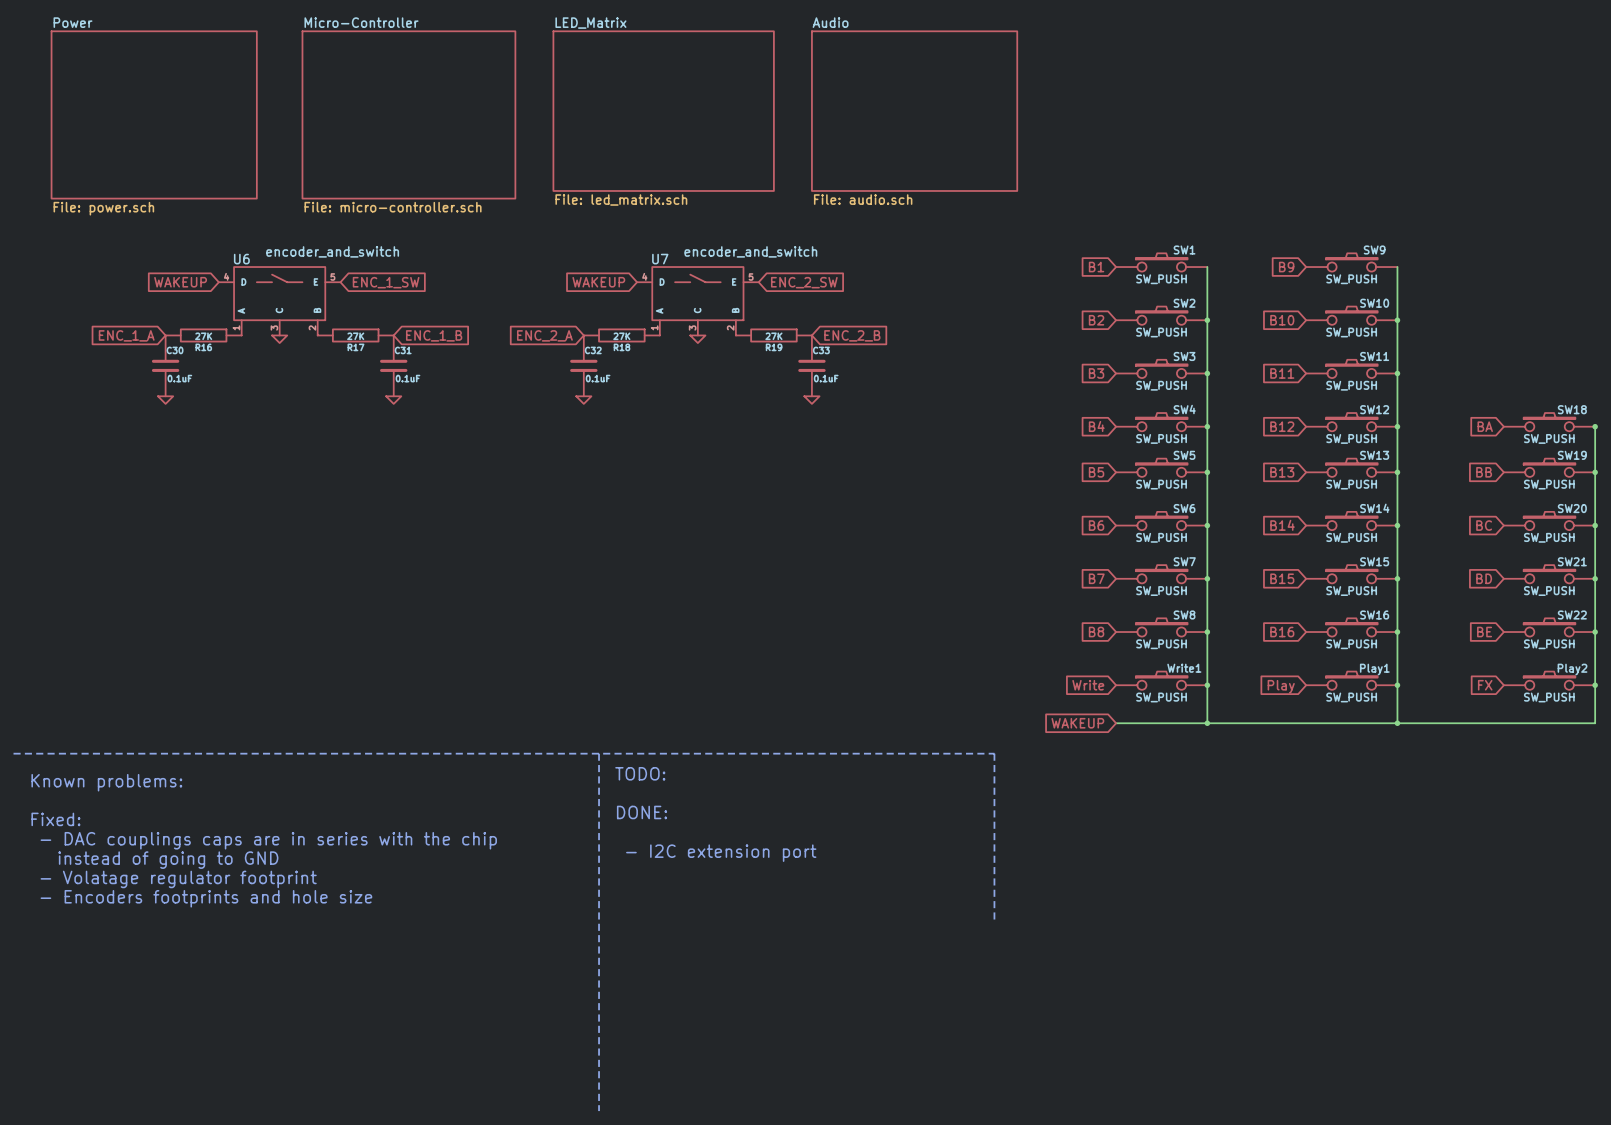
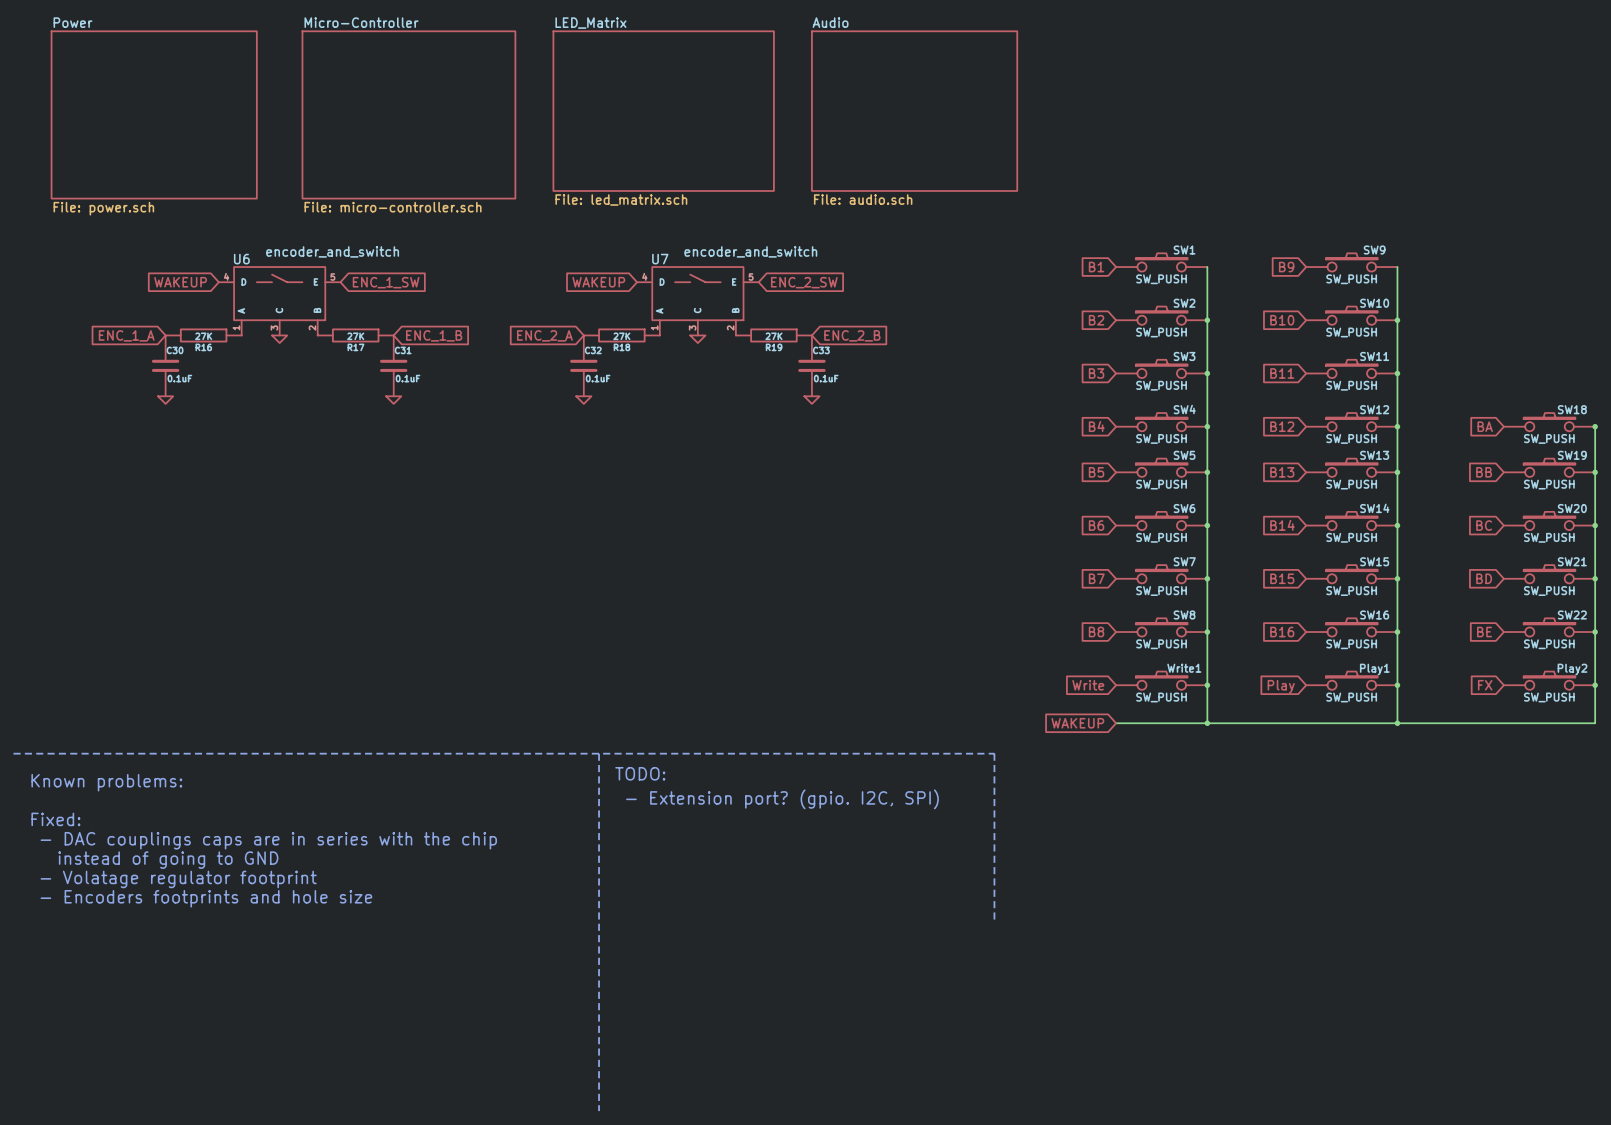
text: none -> - Extension port? (gpio. I2C, SPI) (782, 799)
text: DONE: (642, 812) -> none
text: - I2C extension port (721, 853) -> none

